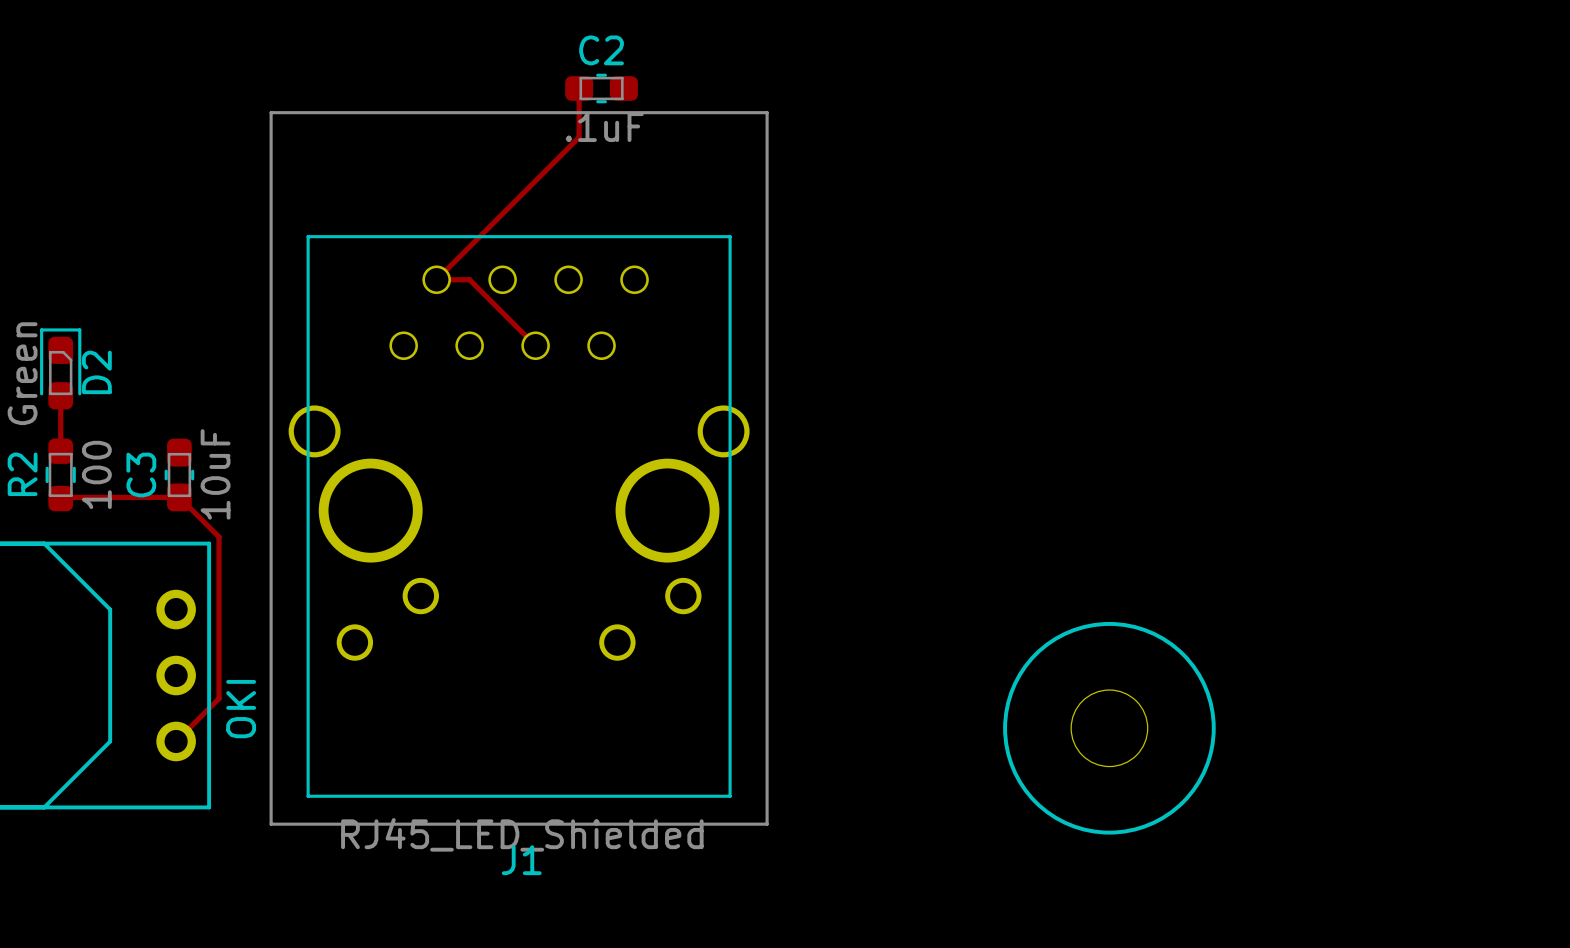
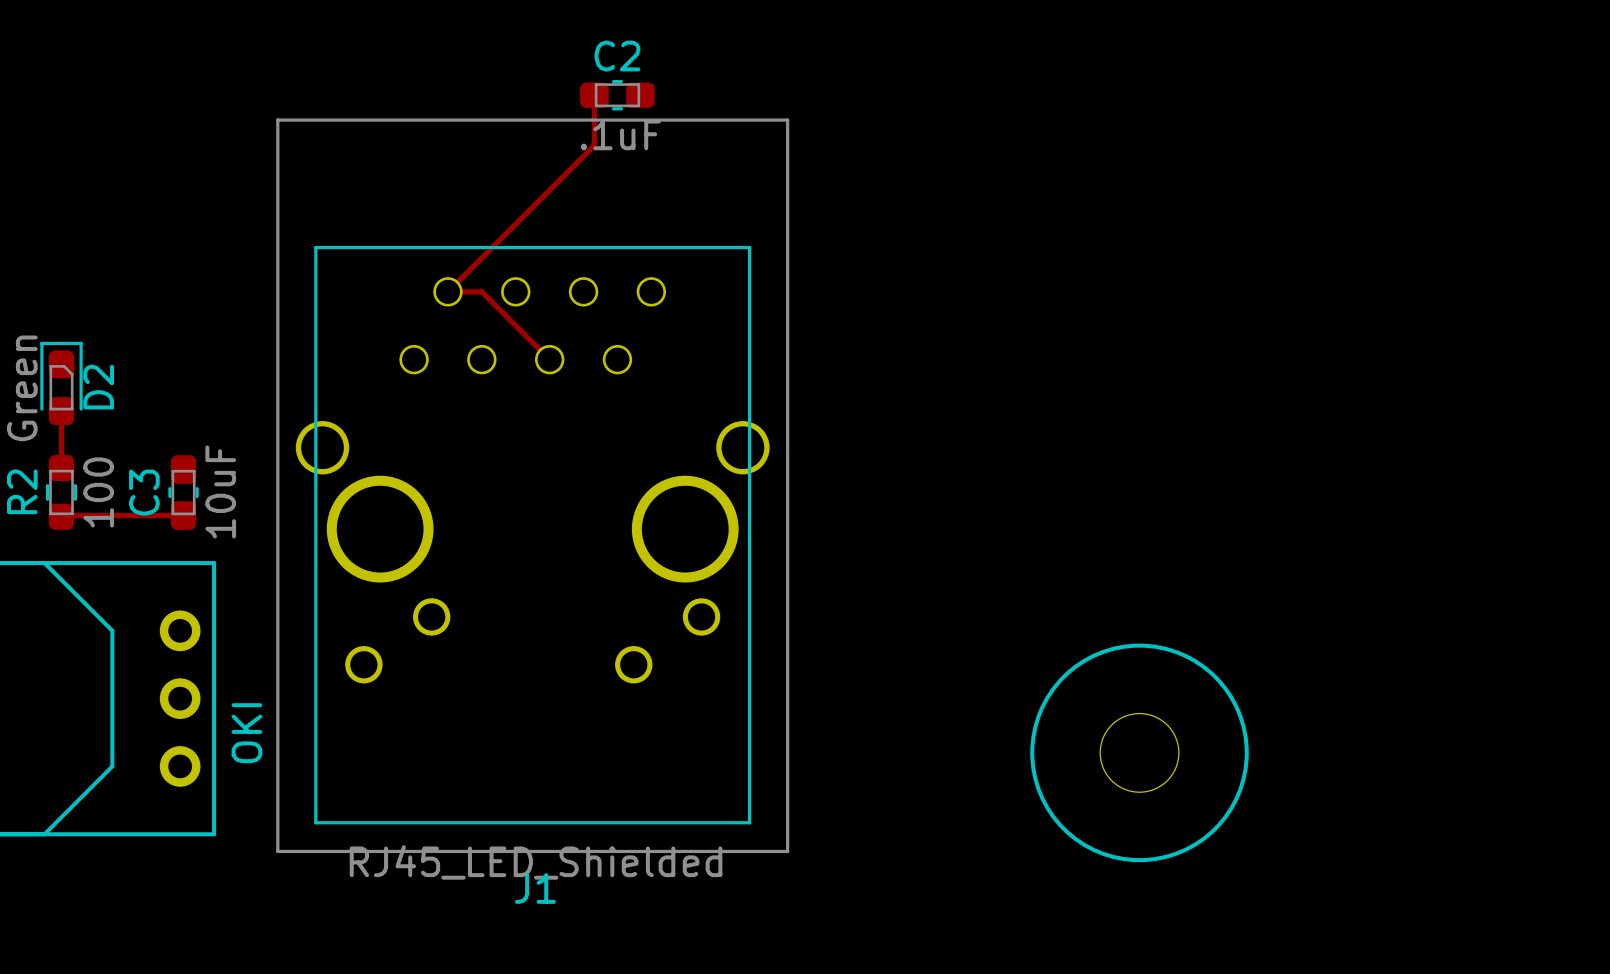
track: (179, 497) (219, 537) (219, 698) (176, 741) -> none

